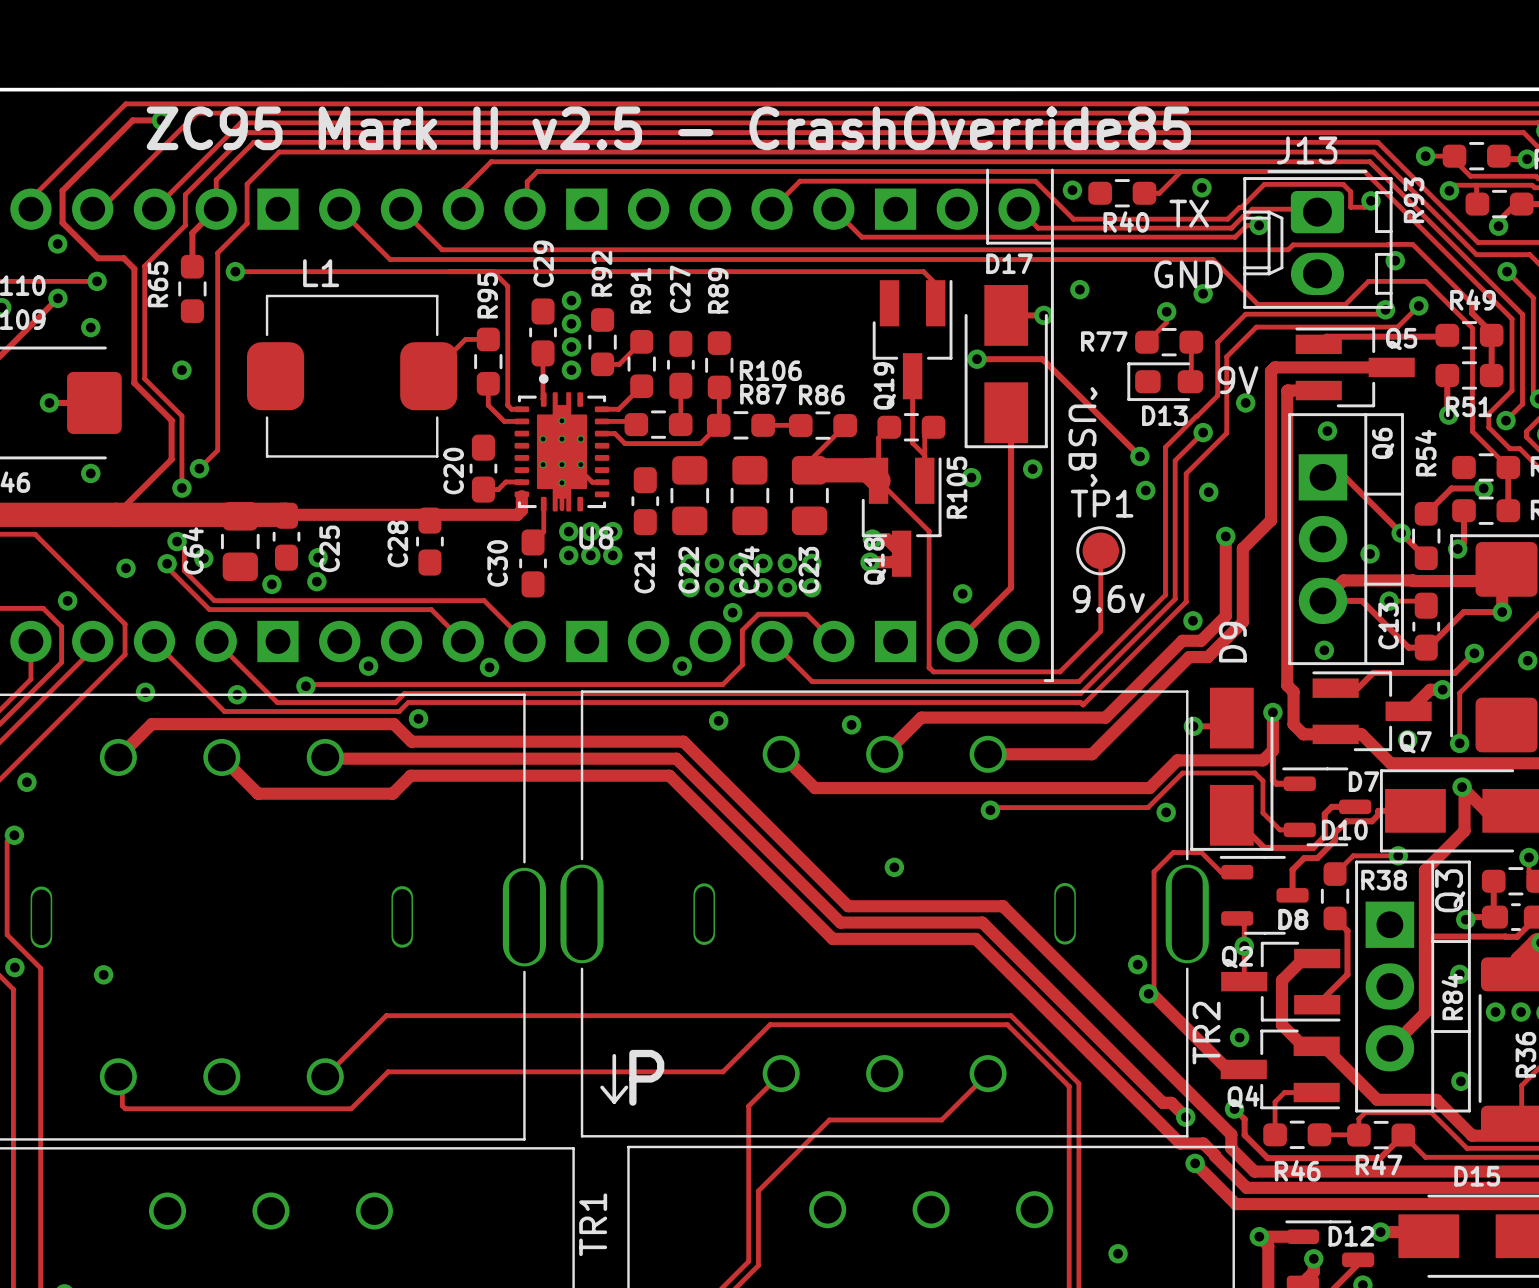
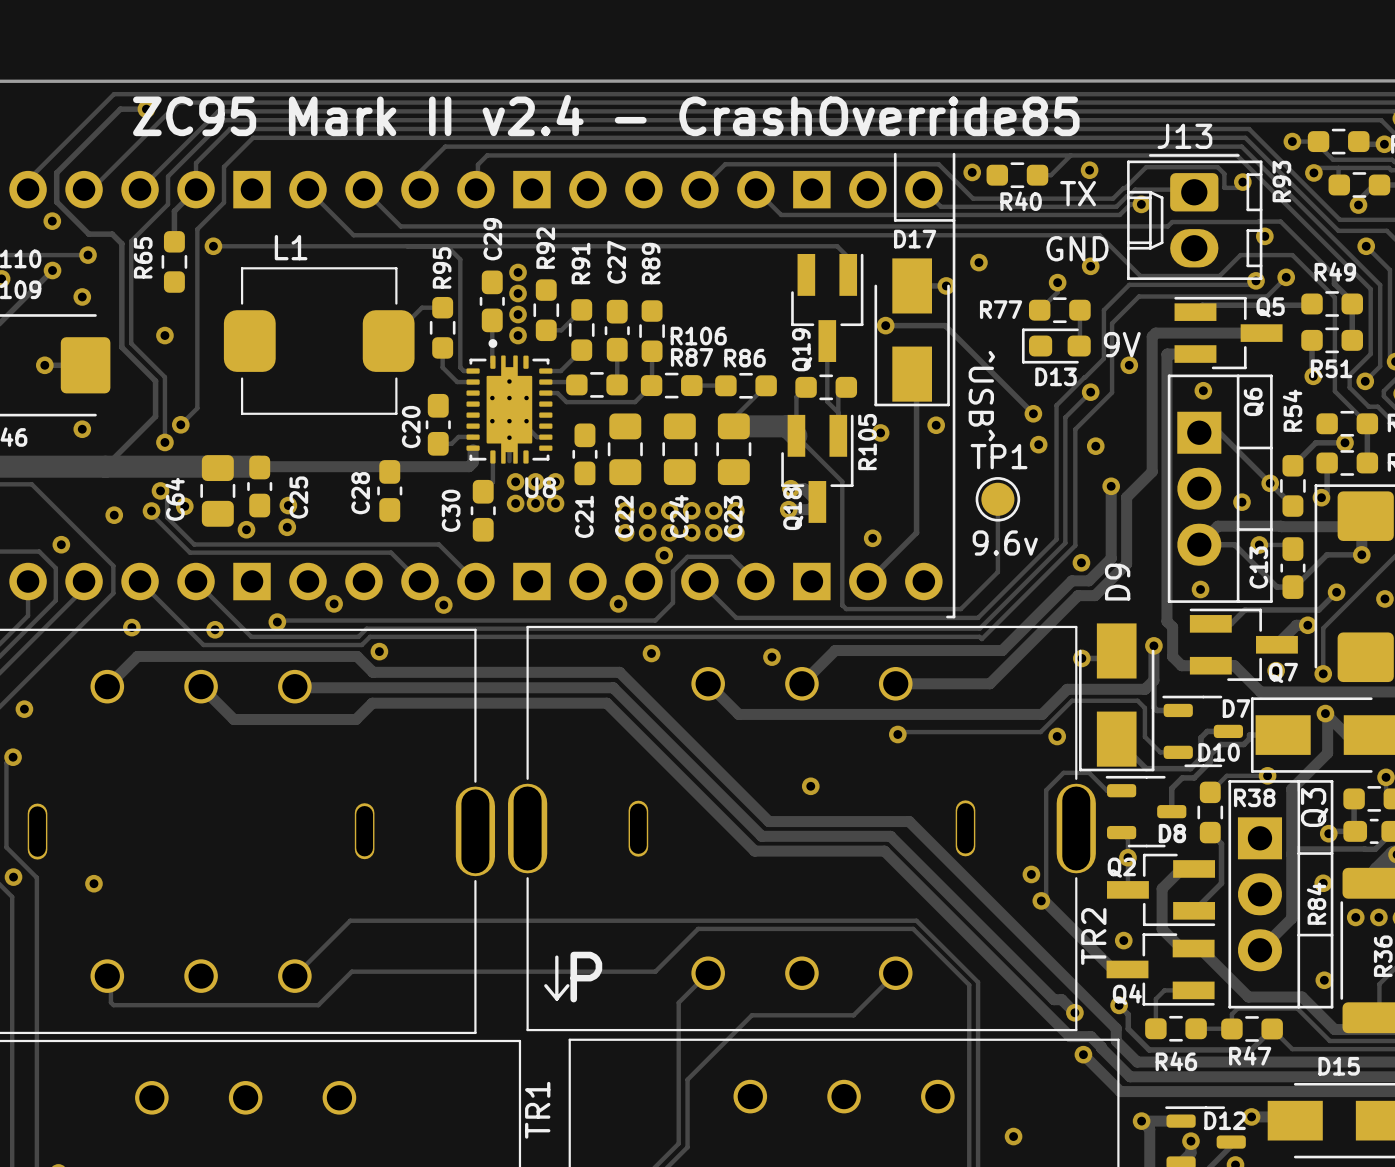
text: ZC95 Mark II v2.5 - CrashOverride85 (668, 128) -> ZC95 Mark II v2.4 - CrashOverride85 (606, 115)

